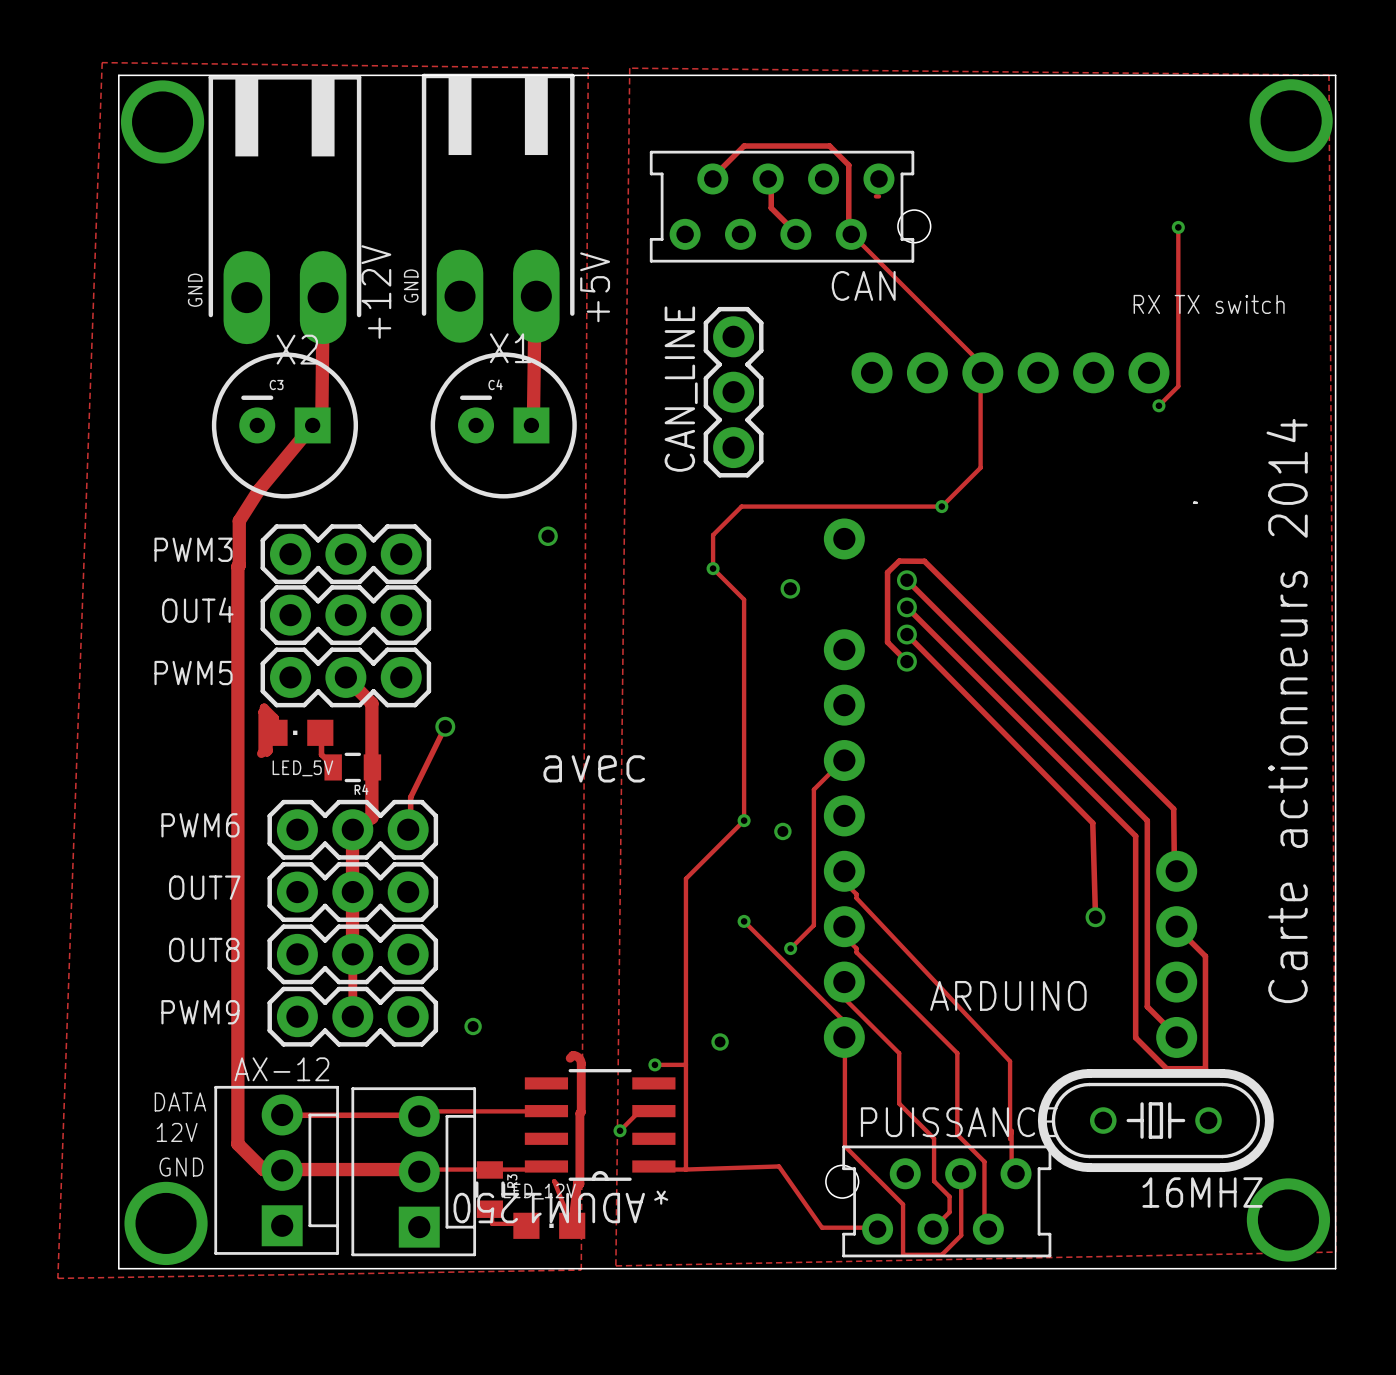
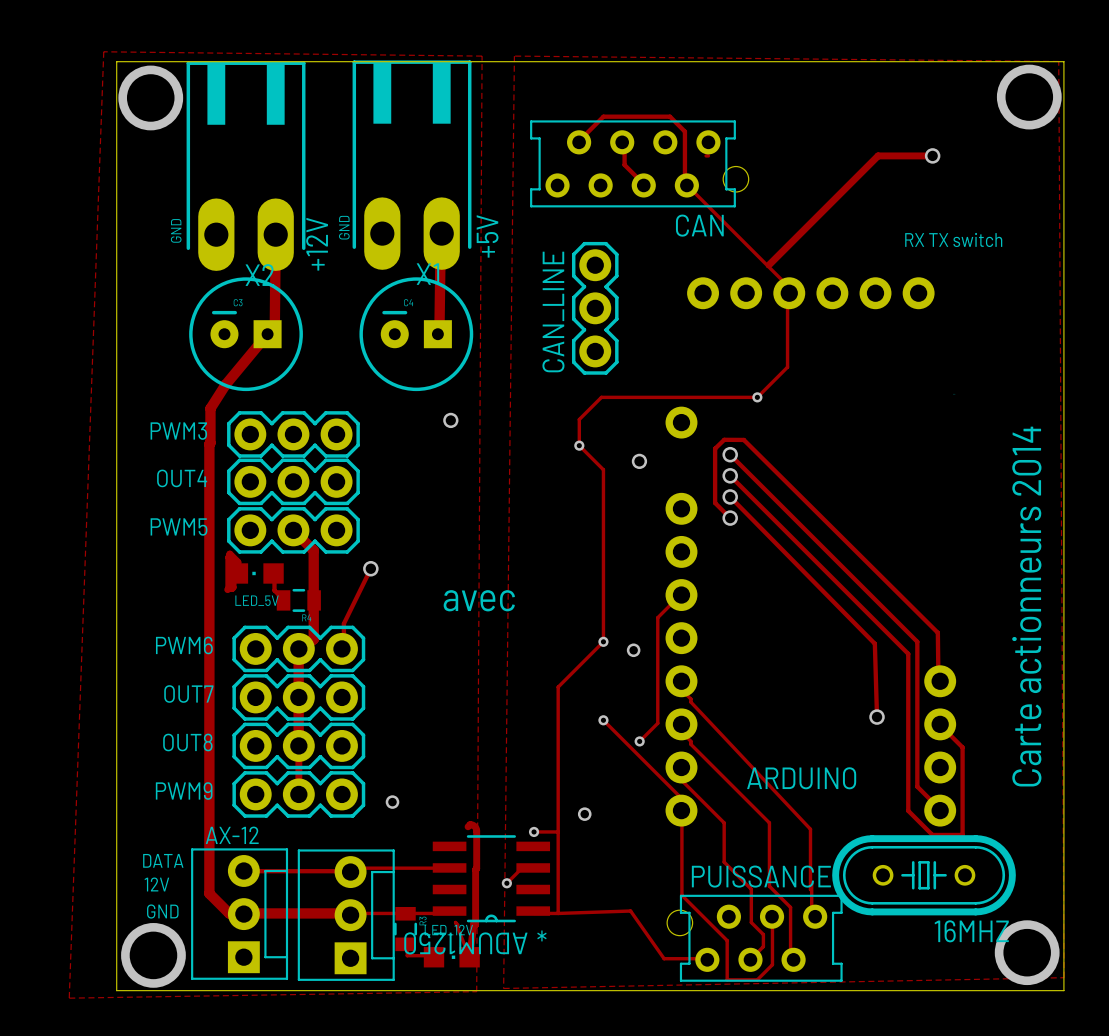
track: none -> (931, 155) (878, 155) (767, 266)
via: none -> (932, 155)
track: (1178, 227) (1178, 386) (1158, 405) -> none
via: (1178, 227) -> none
via: (1158, 405) -> none

